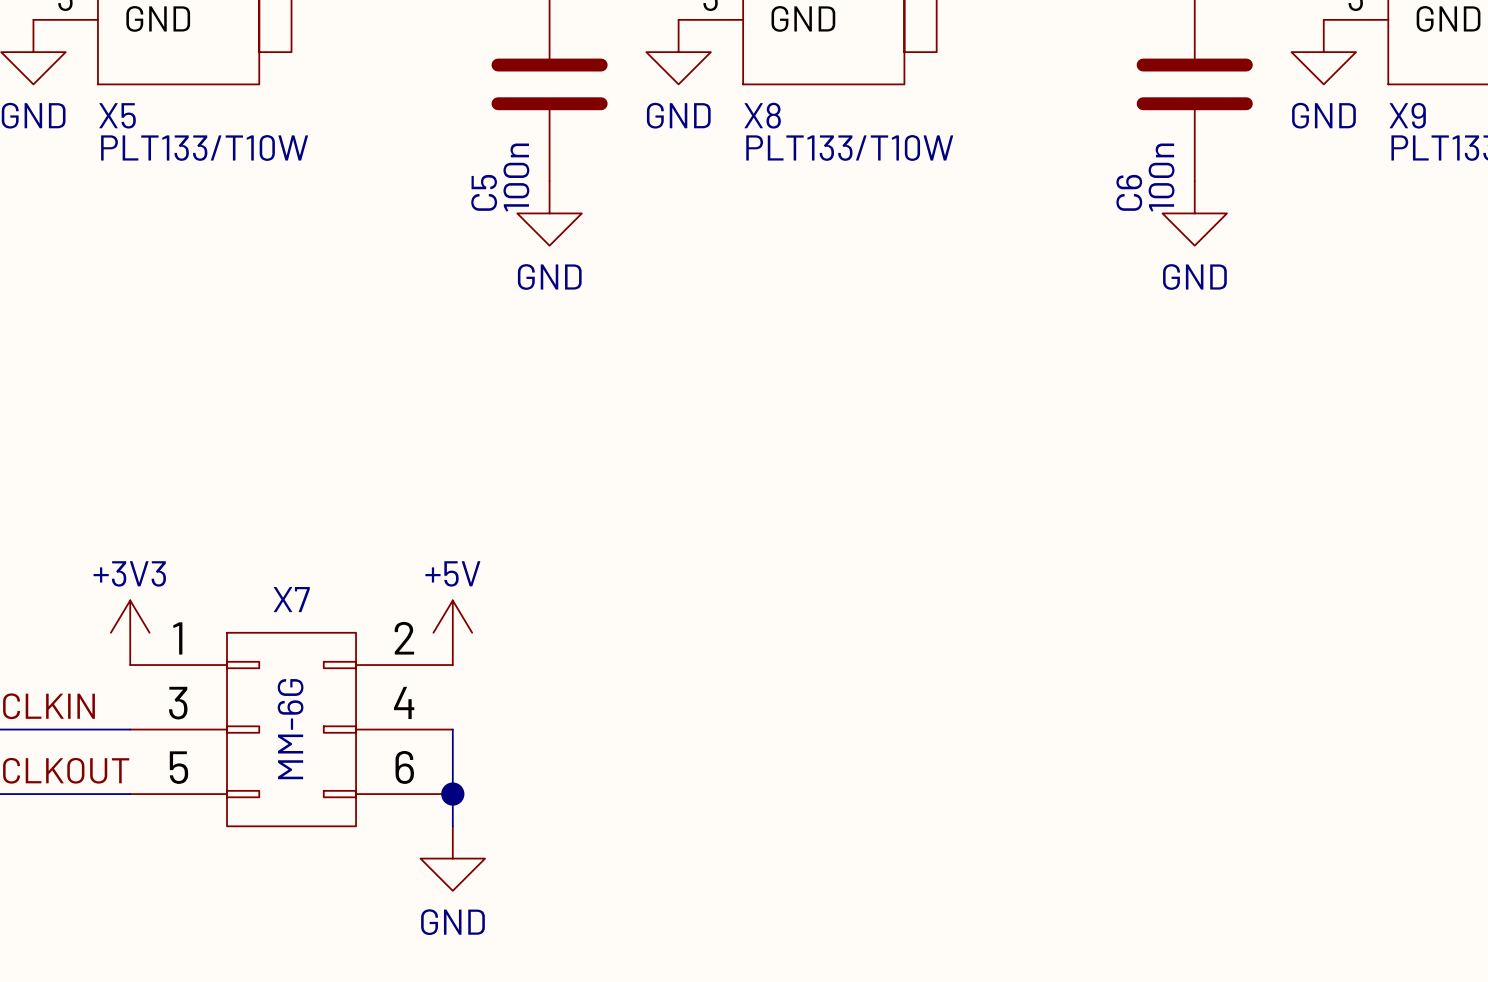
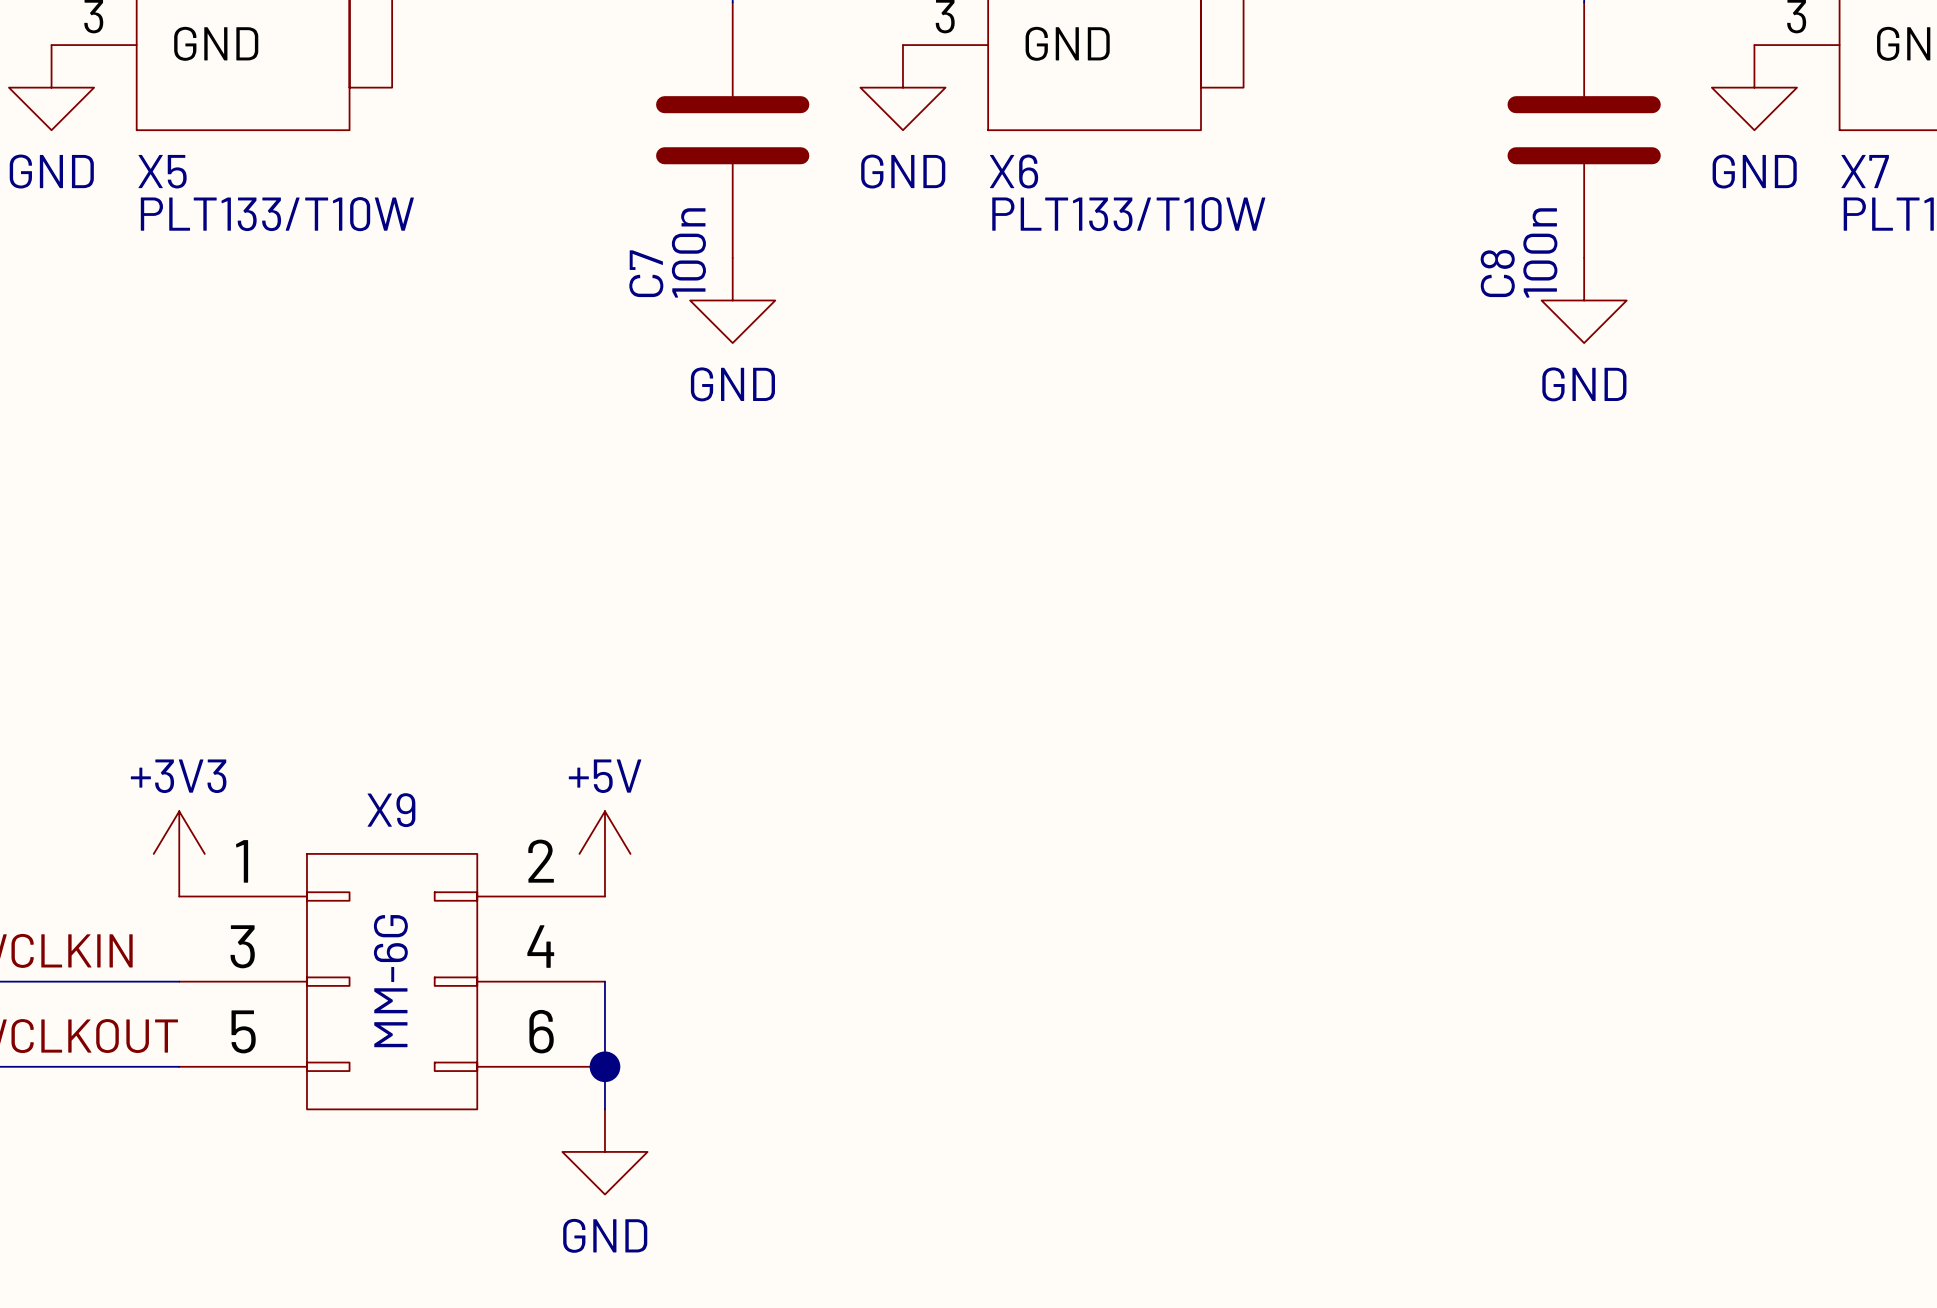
X8 name: X8 (762, 115) -> X6 (1014, 171)
X9 name: X9 (1407, 115) -> X7 (1865, 171)
C5 name: C5 (484, 192) -> C7 (646, 273)
C6 name: C6 (1129, 192) -> C8 (1497, 273)
X7 name: X7 (291, 599) -> X9 (391, 810)

